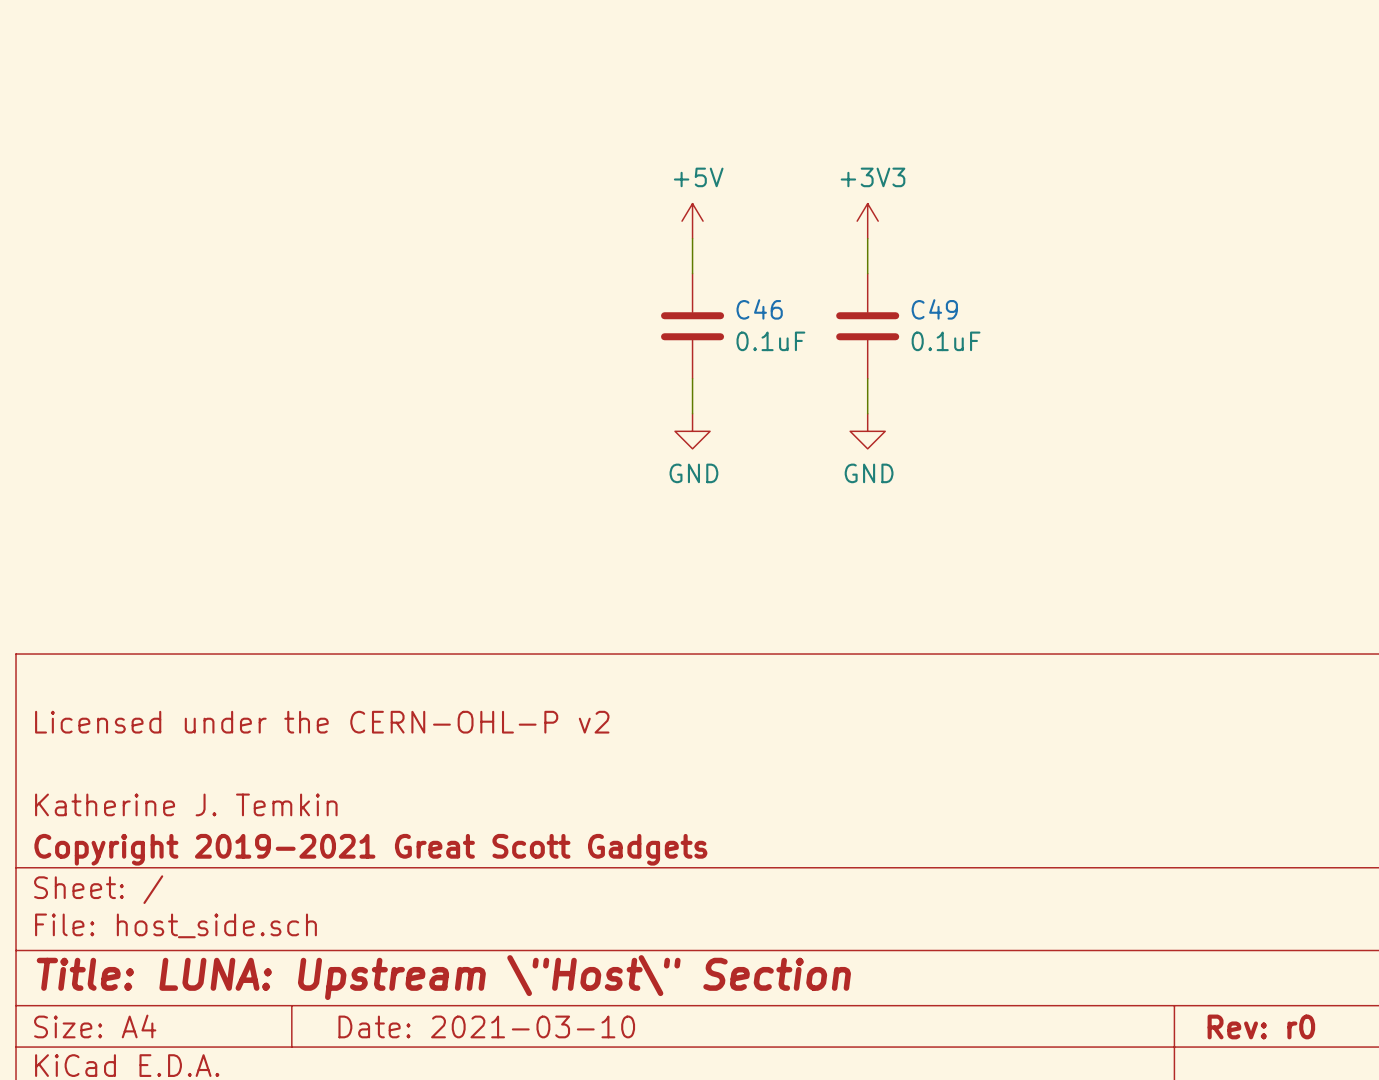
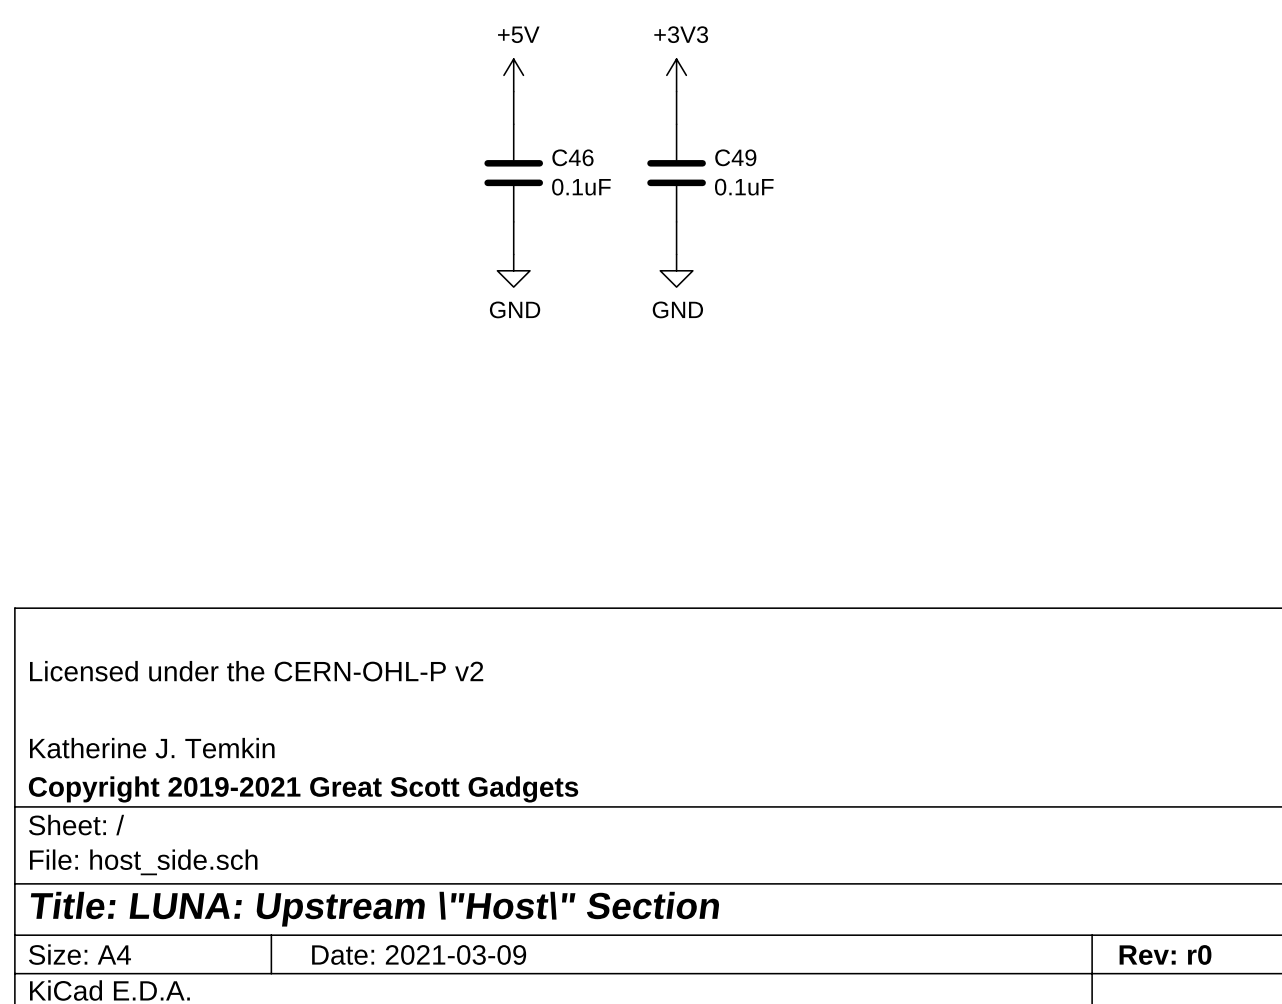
power symbol position: +5V (692, 221) -> +5V (513, 75)
power symbol position: +3V3 (867, 221) -> +3V3 (676, 75)
wire: (692, 238) (692, 273) -> (513, 91) (513, 124)
wire: (867, 238) (867, 273) -> (676, 91) (676, 124)
power symbol: none -> GND (513, 270)
power symbol: none -> GND (676, 270)
C46 position: (692, 326) -> (513, 173)
C49 position: (867, 326) -> (676, 173)
wire: (692, 378) (692, 413) -> (513, 221) (513, 254)
wire: (867, 378) (867, 413) -> (676, 221) (676, 254)
power symbol: GND (692, 431) -> none
power symbol: GND (867, 431) -> none
title block: Date: 2021-03-10 (486, 1026) -> Date: 2021-03-09 (419, 954)

